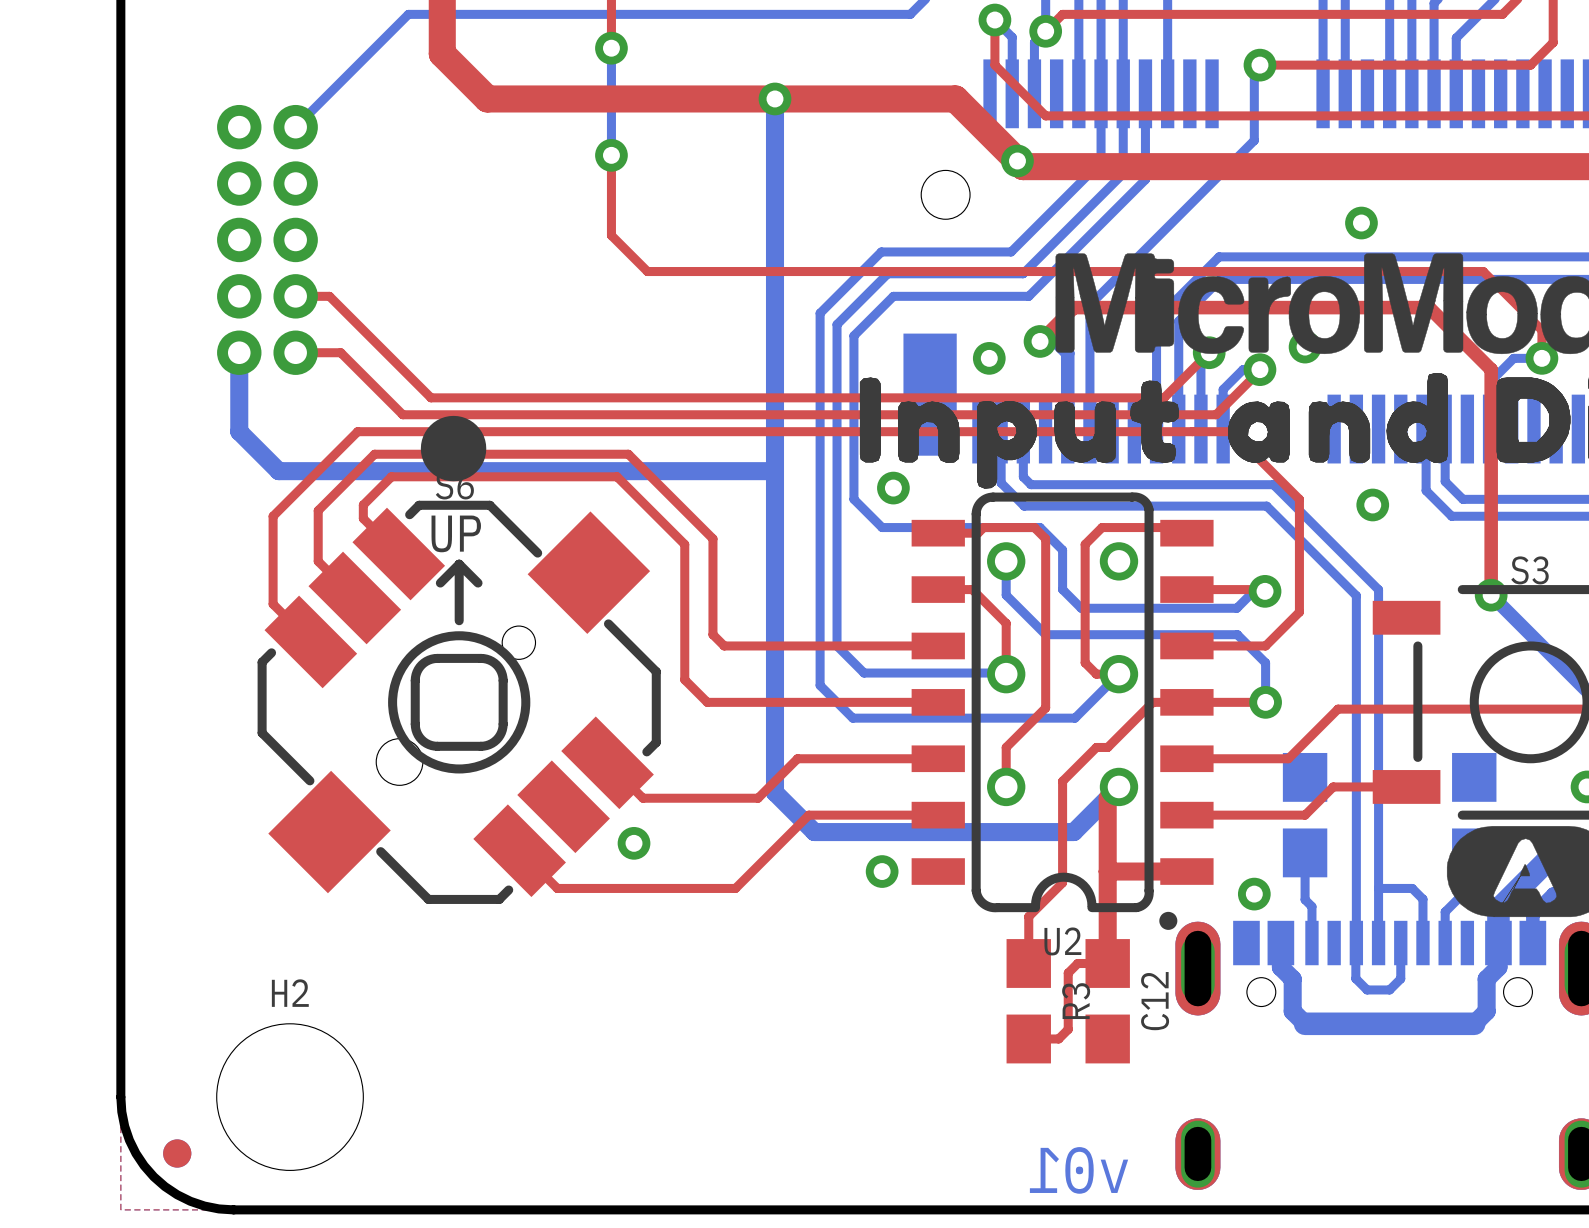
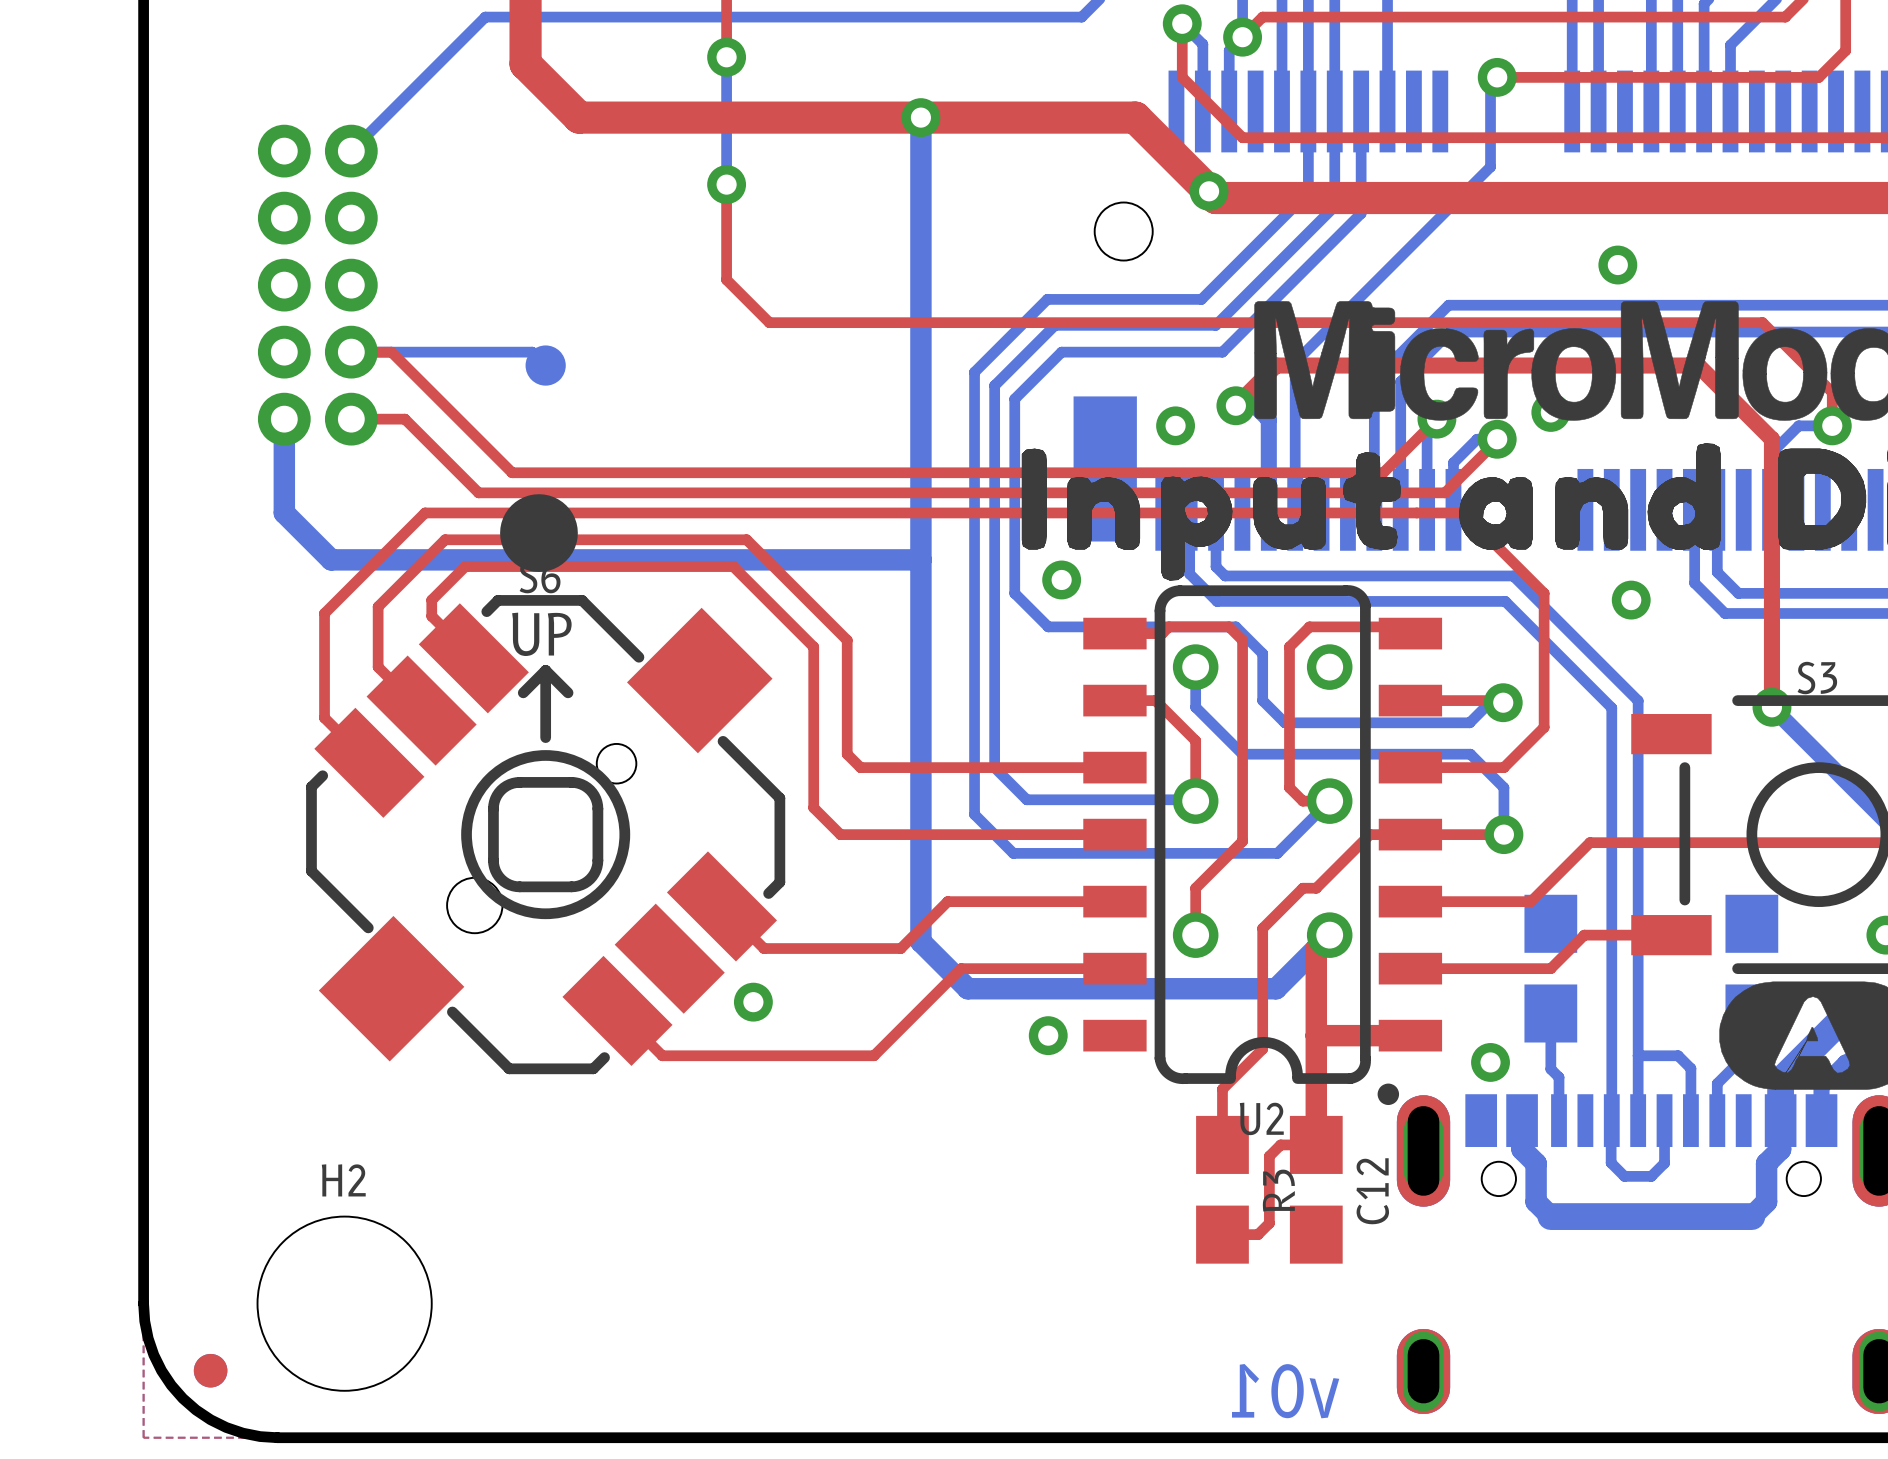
bottom track: none -> (351, 352) (532, 352) (545, 365)
part: none -> (545, 365)

